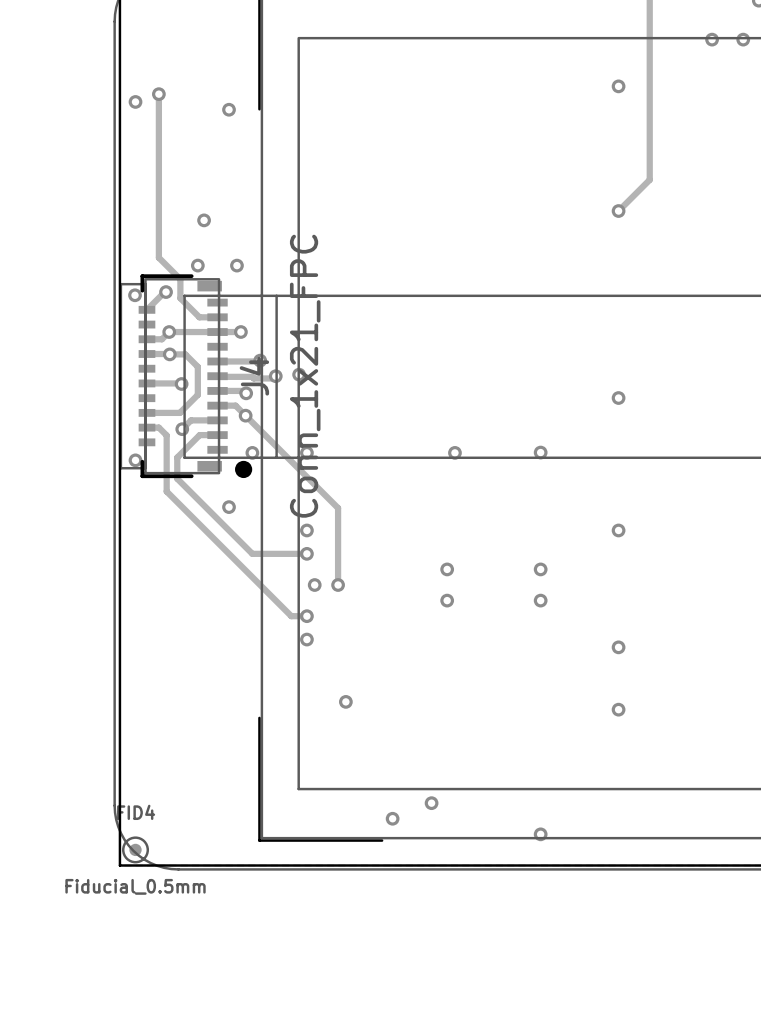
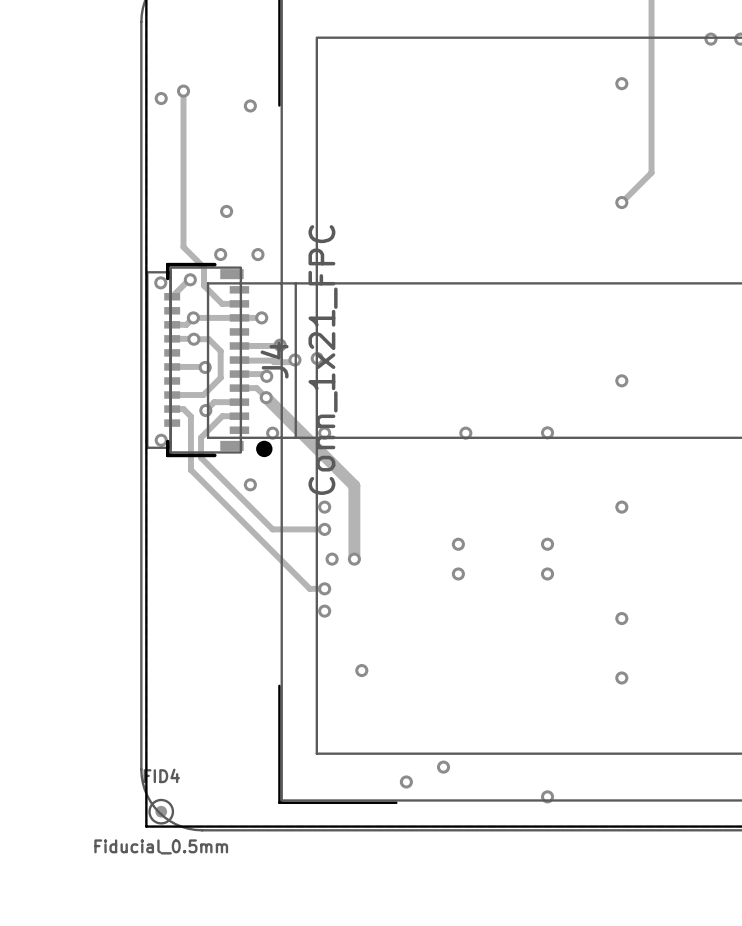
track width: thin (245, 415) (338, 508) (338, 585) -> thick (266, 397) (354, 485) (354, 559)

